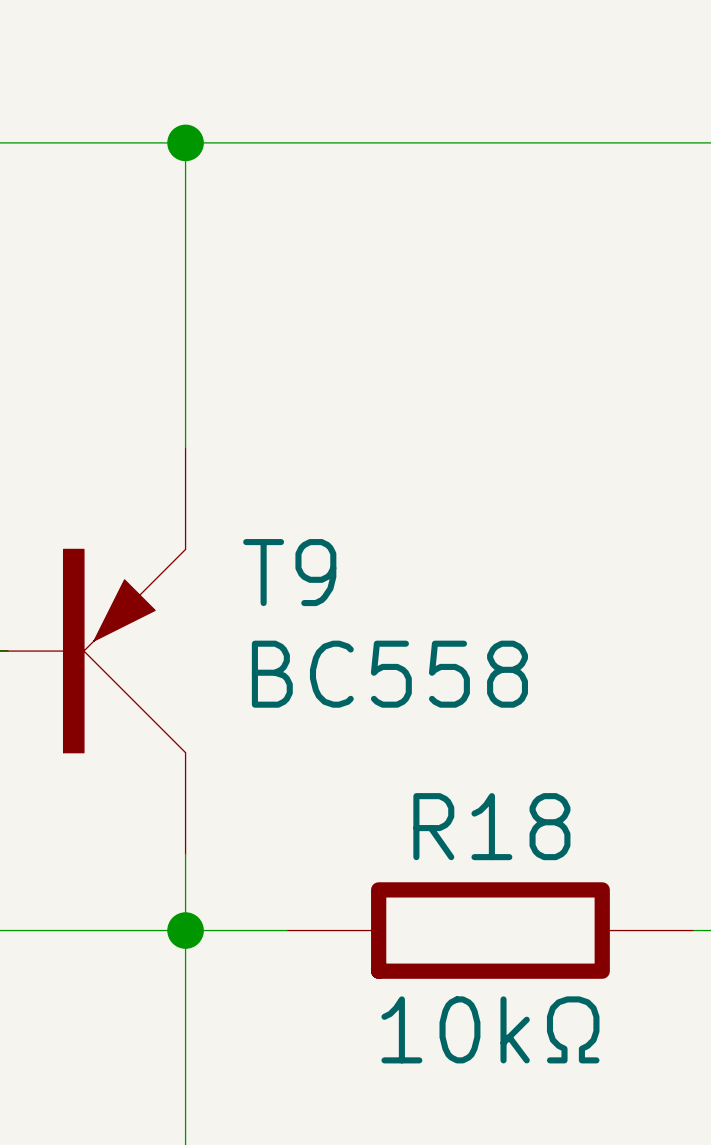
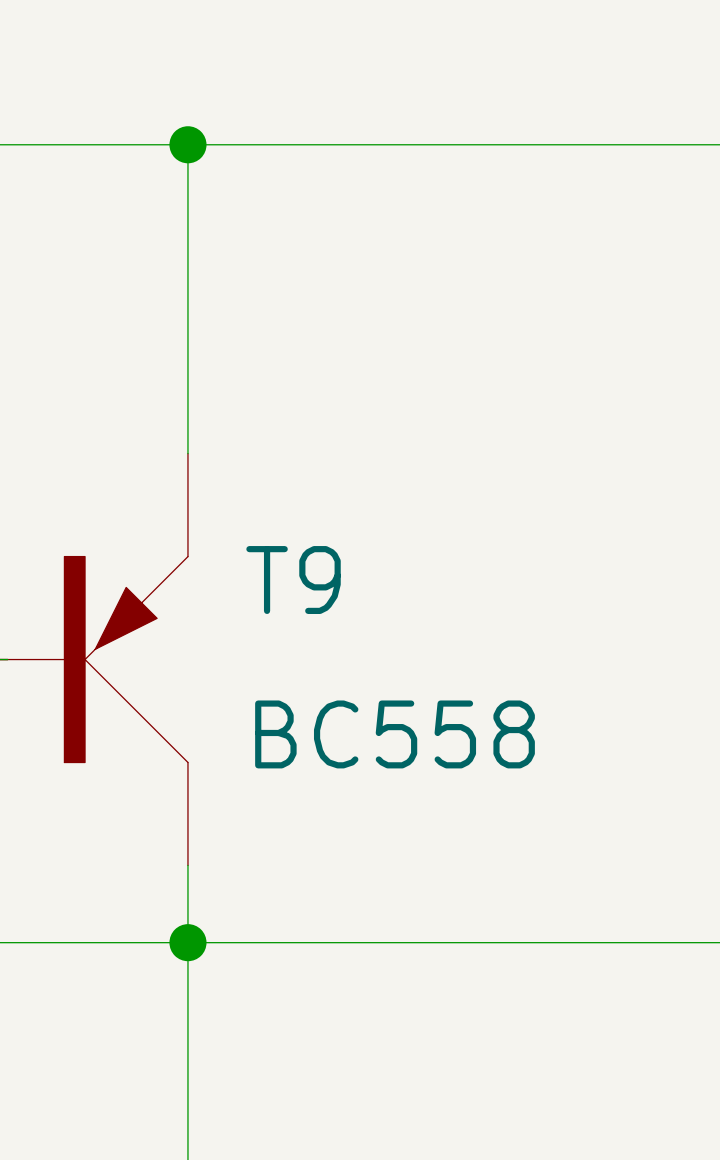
T9 value position: BC558 (389, 674) -> BC558 (395, 734)
wire: none -> (290, 942) (702, 942)
R18: 10kΩ (490, 930) -> none

